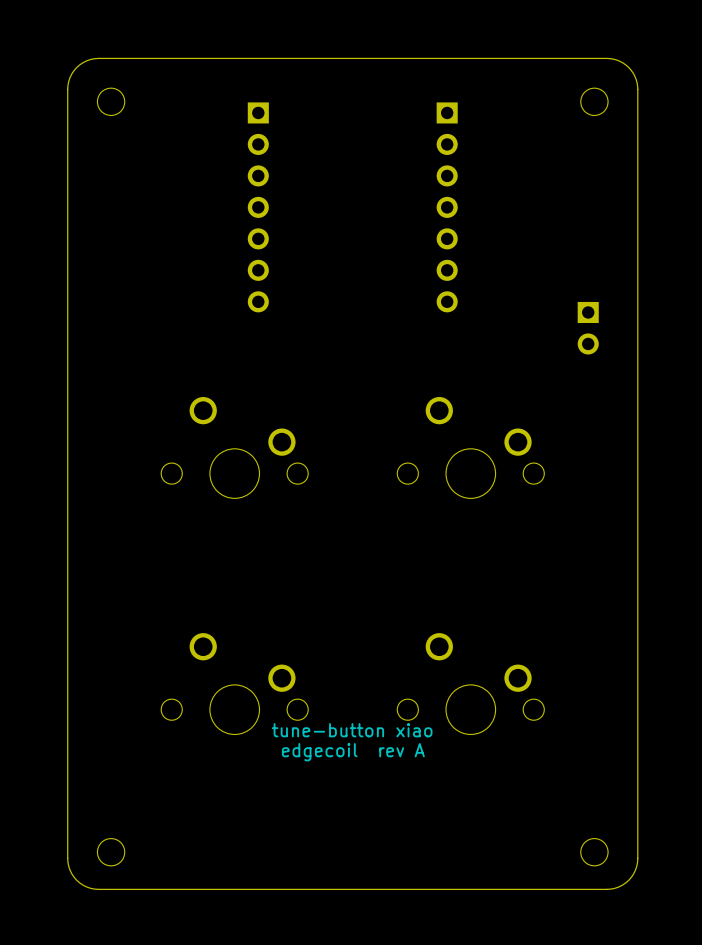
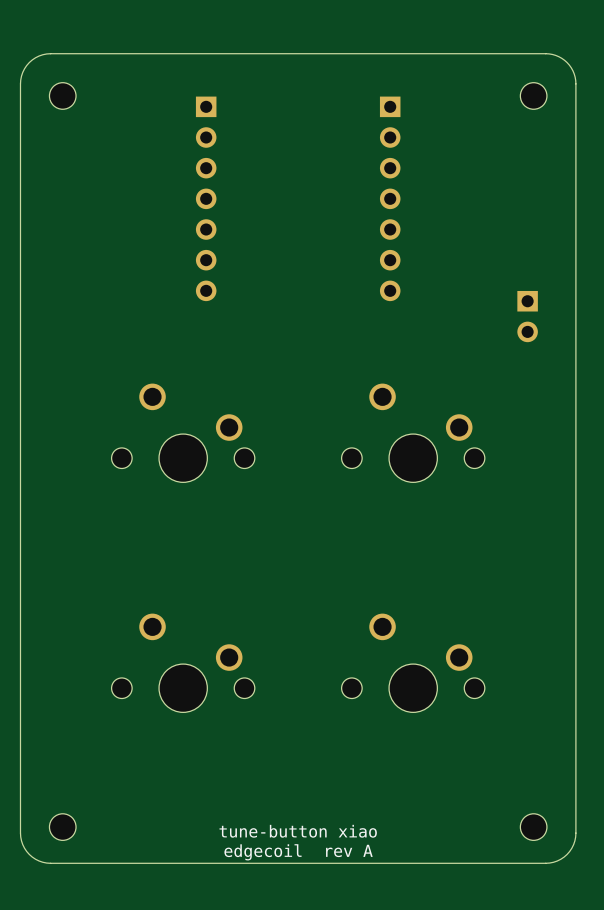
text position: tune-button xiao (352, 730) -> tune-button xiao (298, 831)
text position: edgecoil rev A (353, 752) -> edgecoil rev A (298, 852)

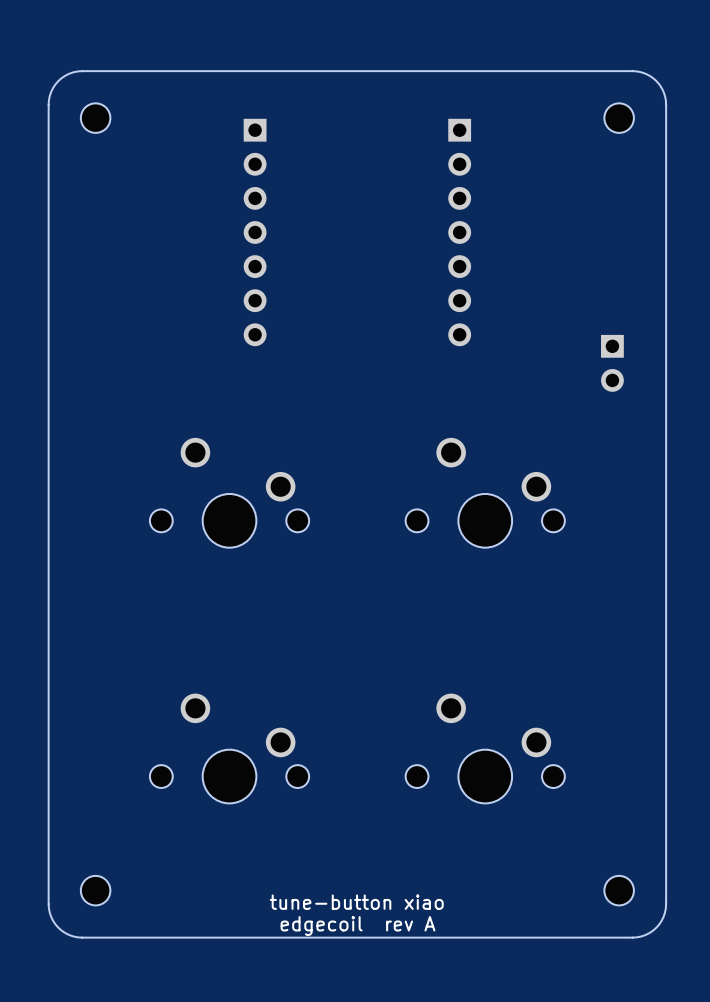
text: none -> tune-button xiao (356, 902)
board edge: (575, 802) (575, 837) (571, 848) (560, 859) (545, 863) (46, 863) (32, 857) (22, 844) (20, 833) (20, 802) -> (666, 904) (663, 916) (656, 927) (645, 935) (632, 937) (82, 937) (69, 935) (58, 927) (51, 916) (48, 904)
part position: (62, 827) -> (95, 890)
part position: (533, 827) -> (619, 890)
text: tune-button xiao (298, 831) -> edgecoil rev A (358, 926)
text: edgecoil rev A (298, 852) -> none

